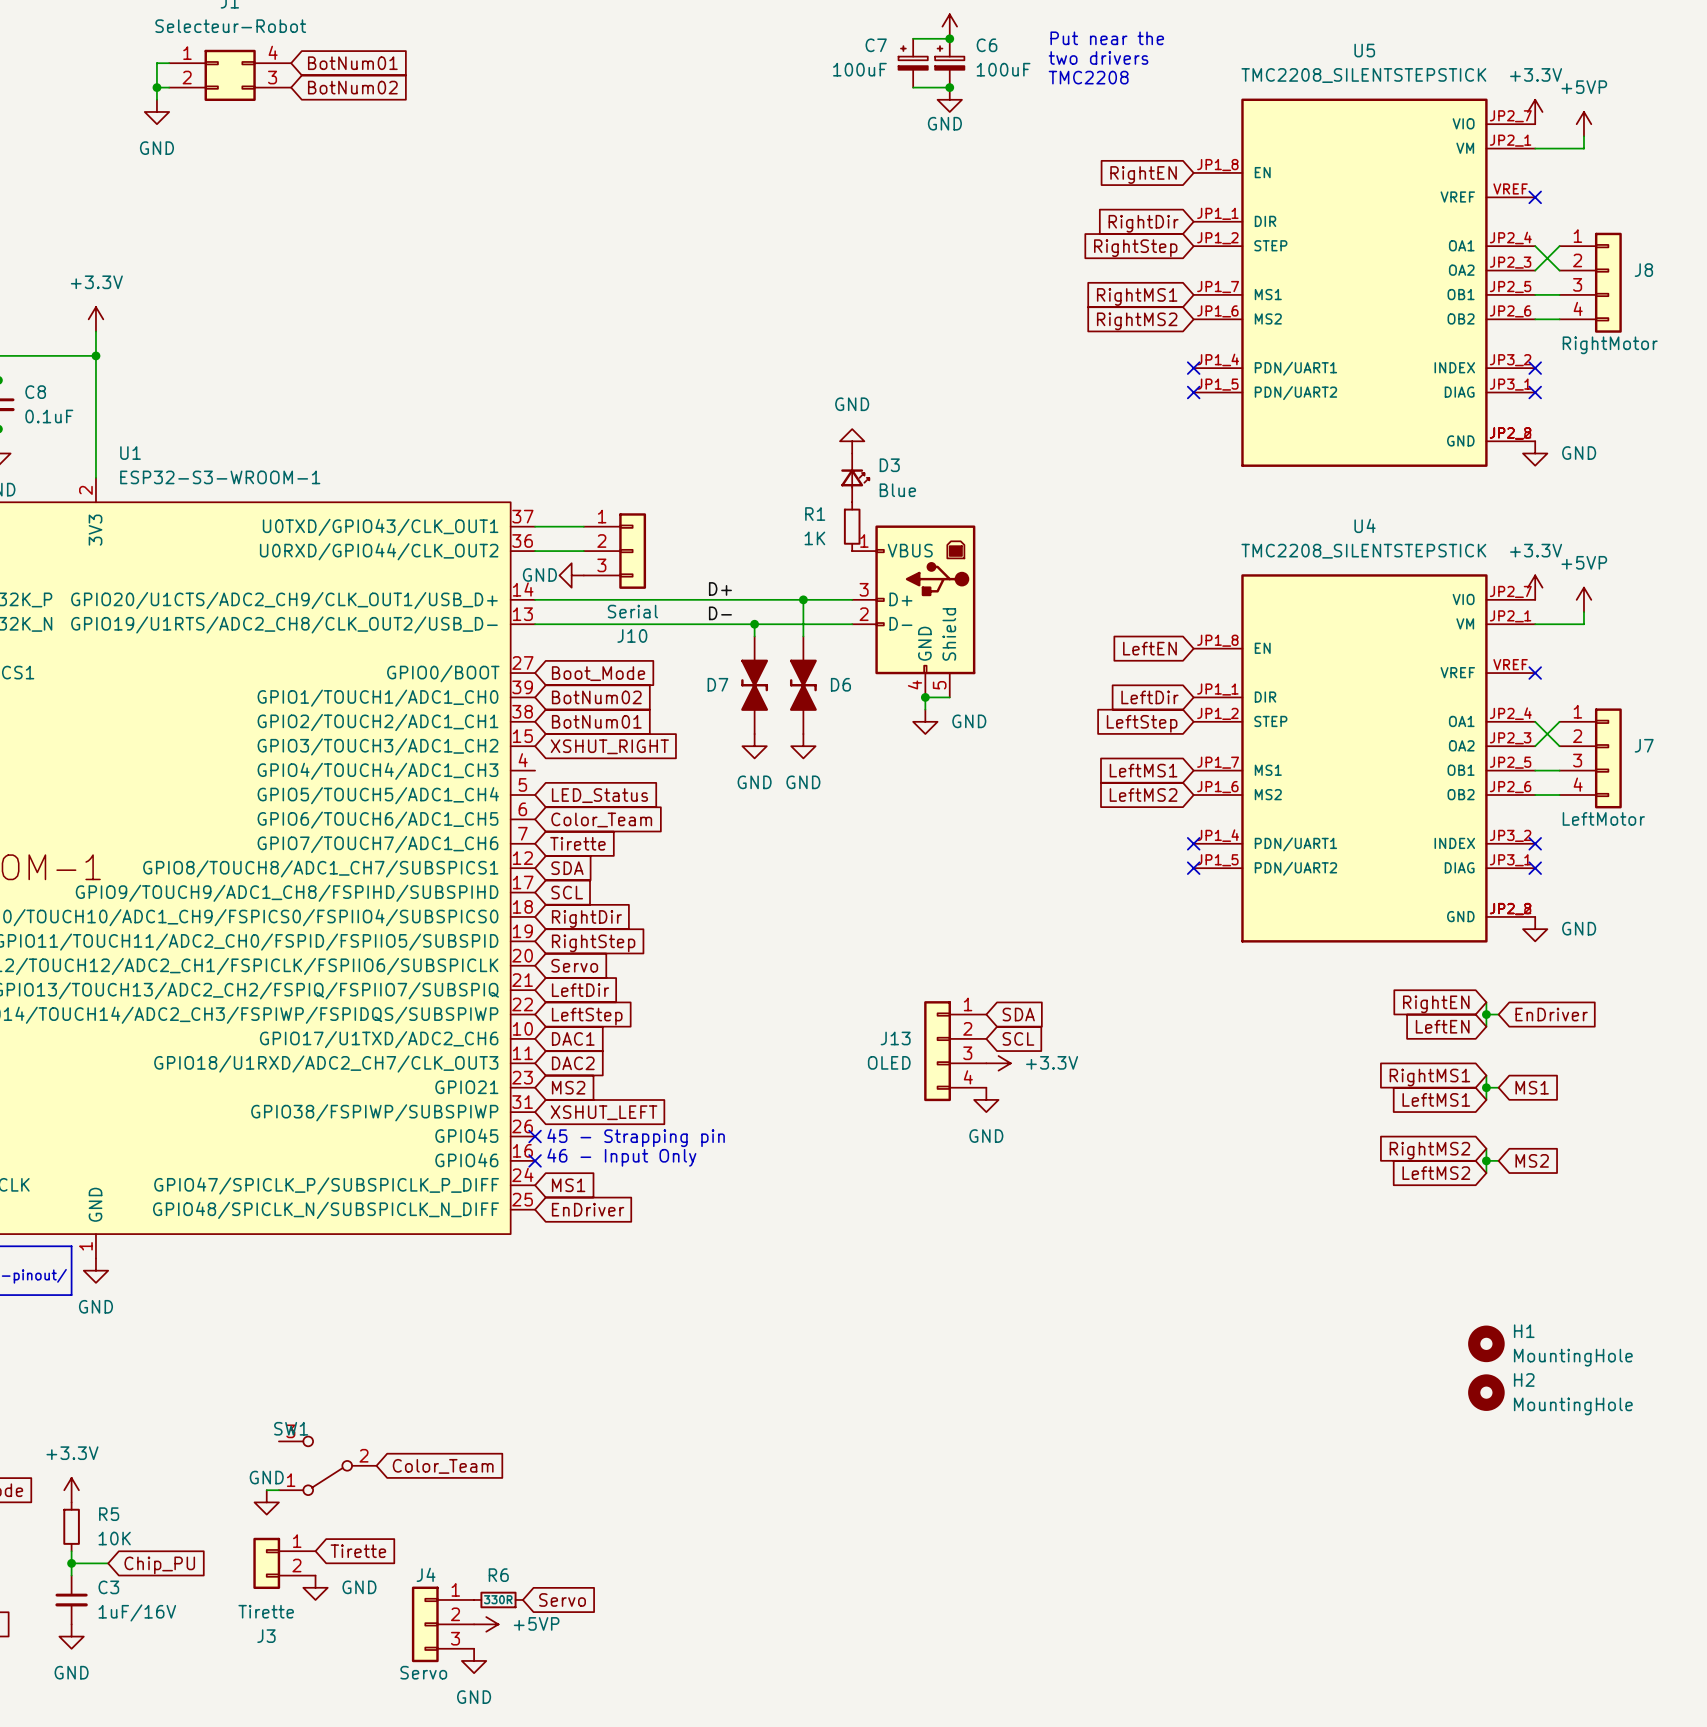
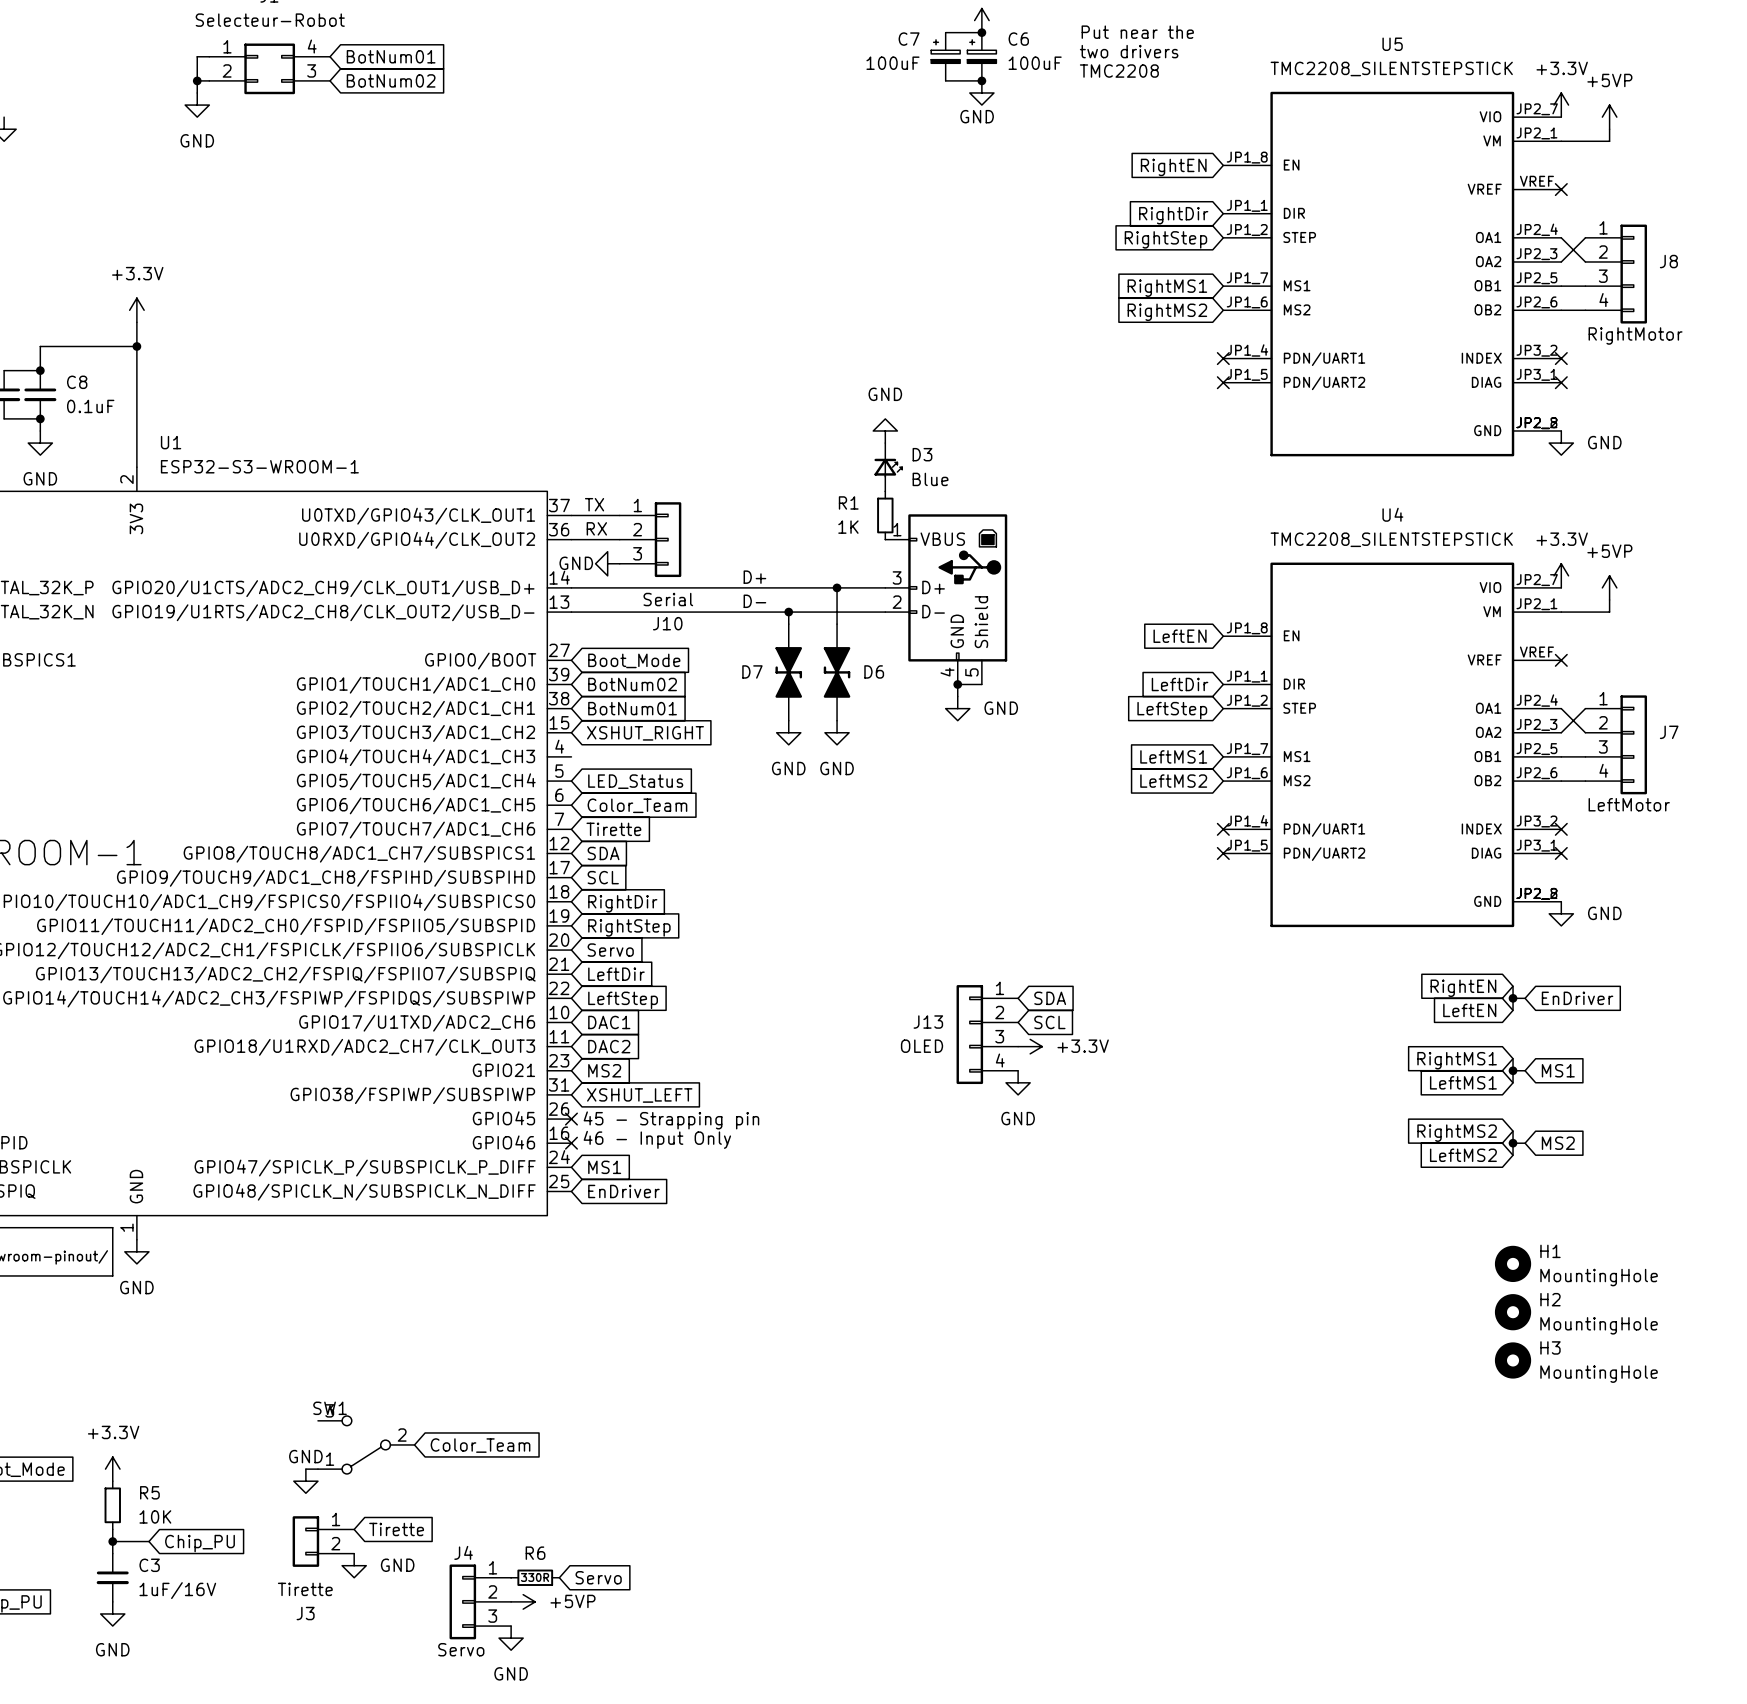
label: none -> TX (594, 504)
label: none -> RX (596, 528)
H1 position: (1486, 1343) -> (1513, 1263)
H3: none -> MountingHole (1513, 1360)
H2 position: (1486, 1392) -> (1513, 1312)

